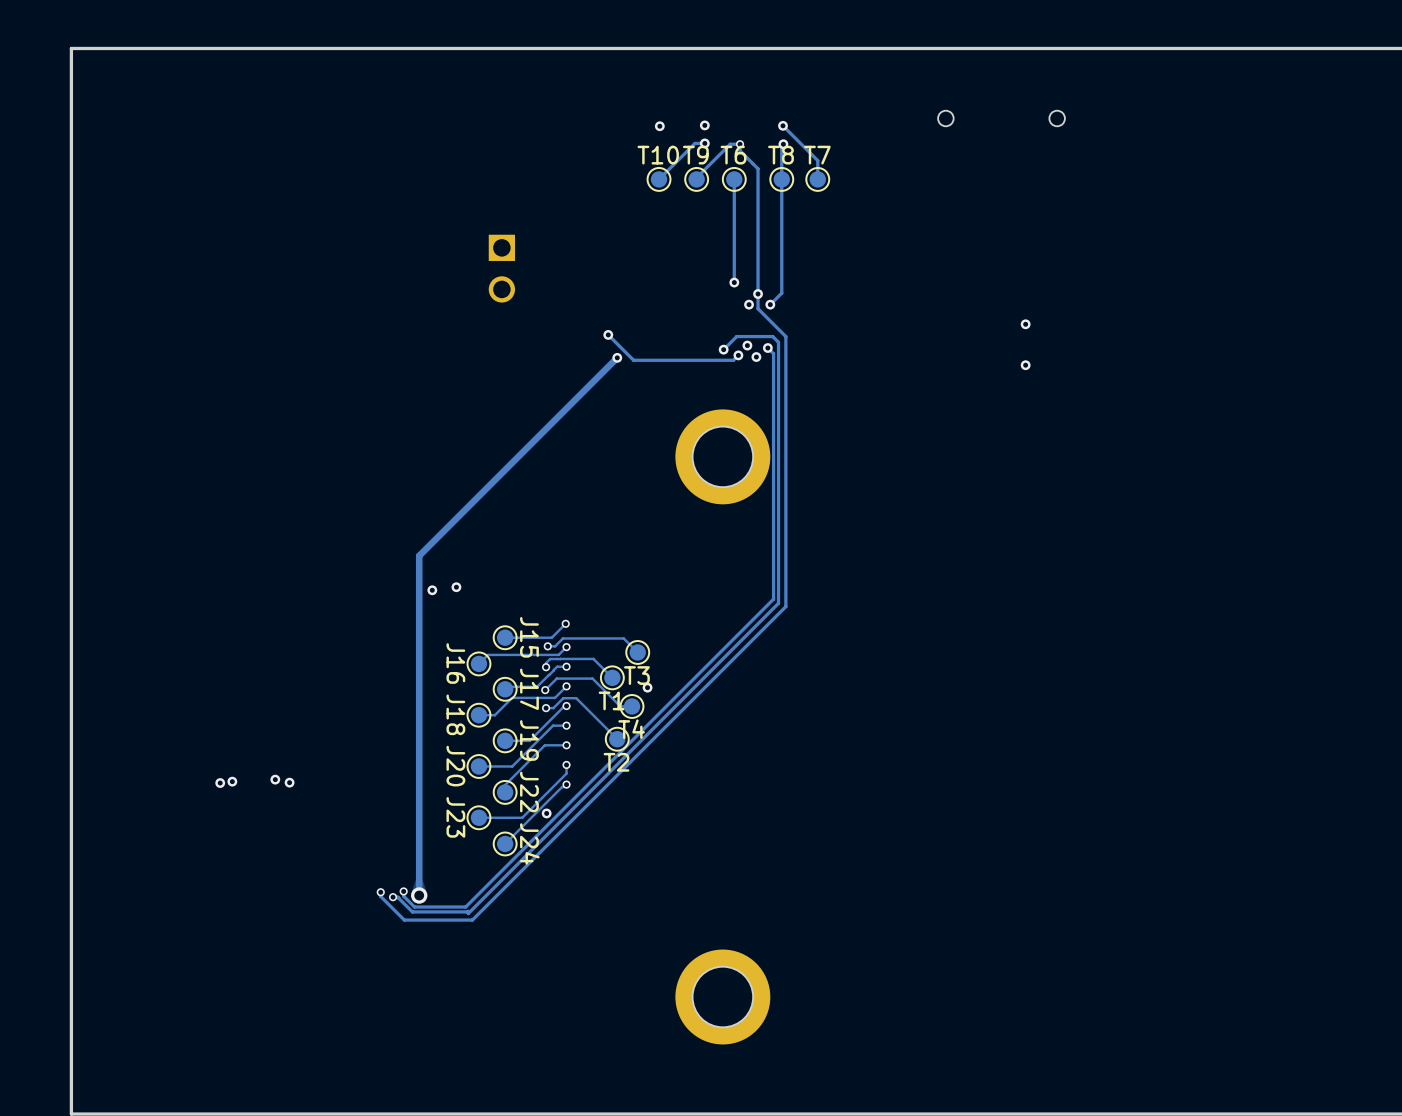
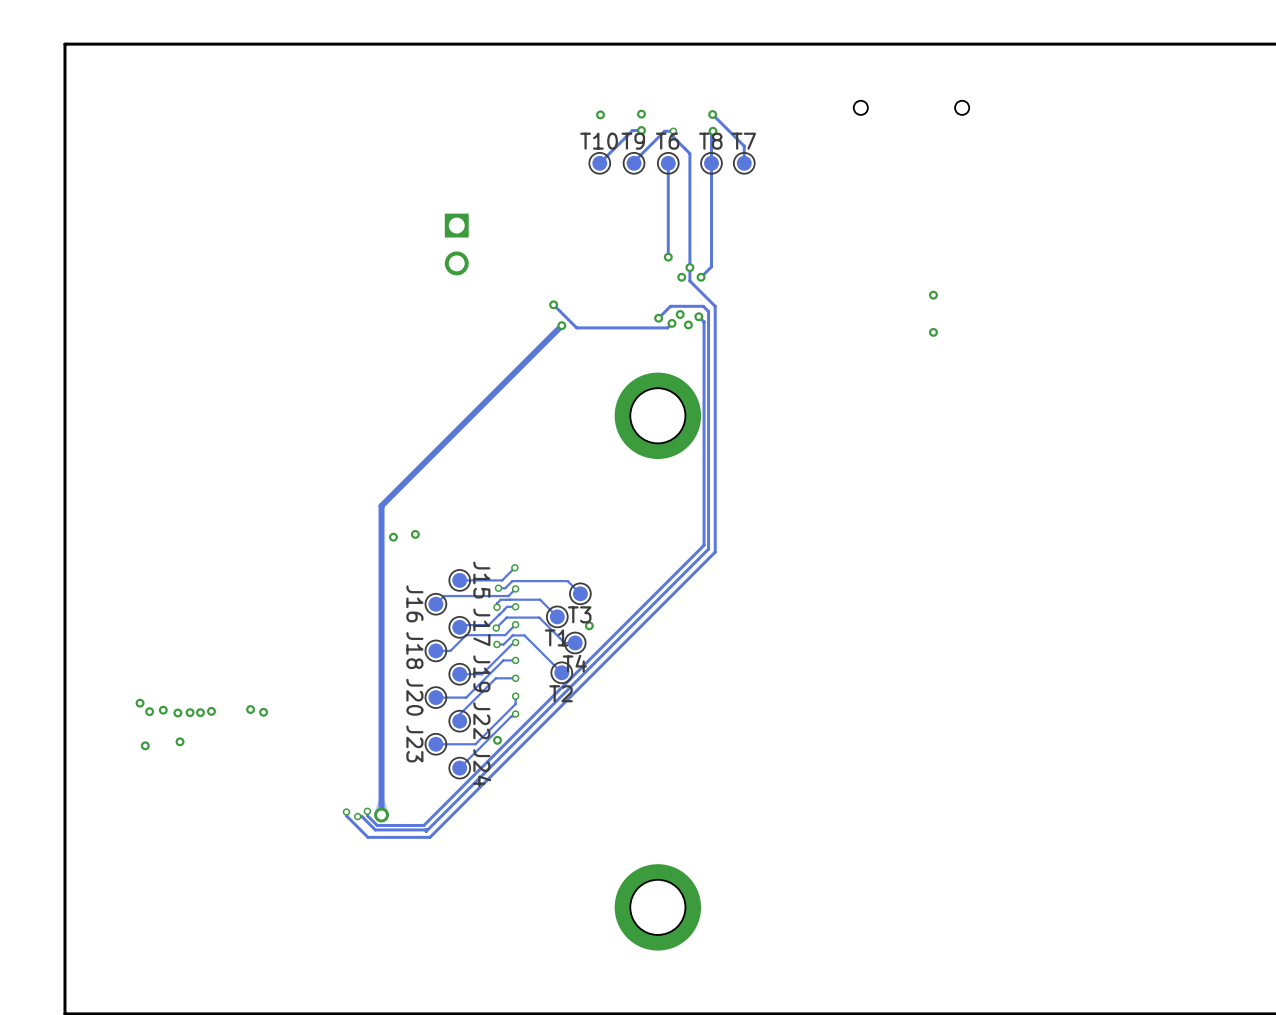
via: none -> (140, 703)
via: none -> (163, 710)
via: none -> (149, 711)
via: none -> (177, 712)
via: none -> (190, 712)
via: none -> (180, 741)
via: none -> (145, 745)

